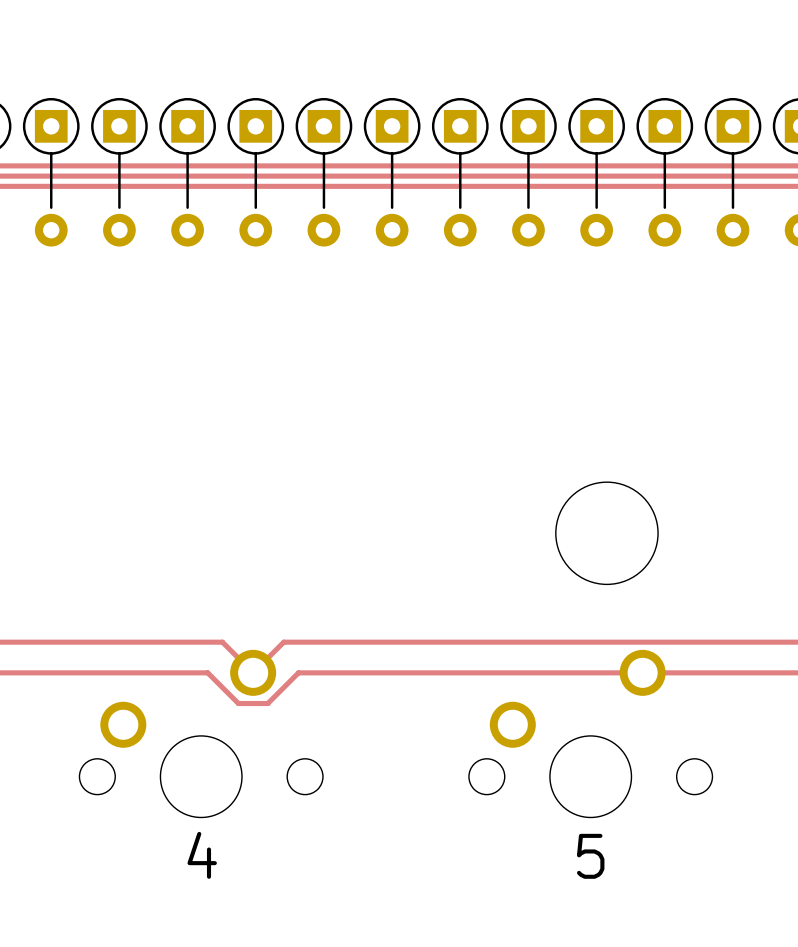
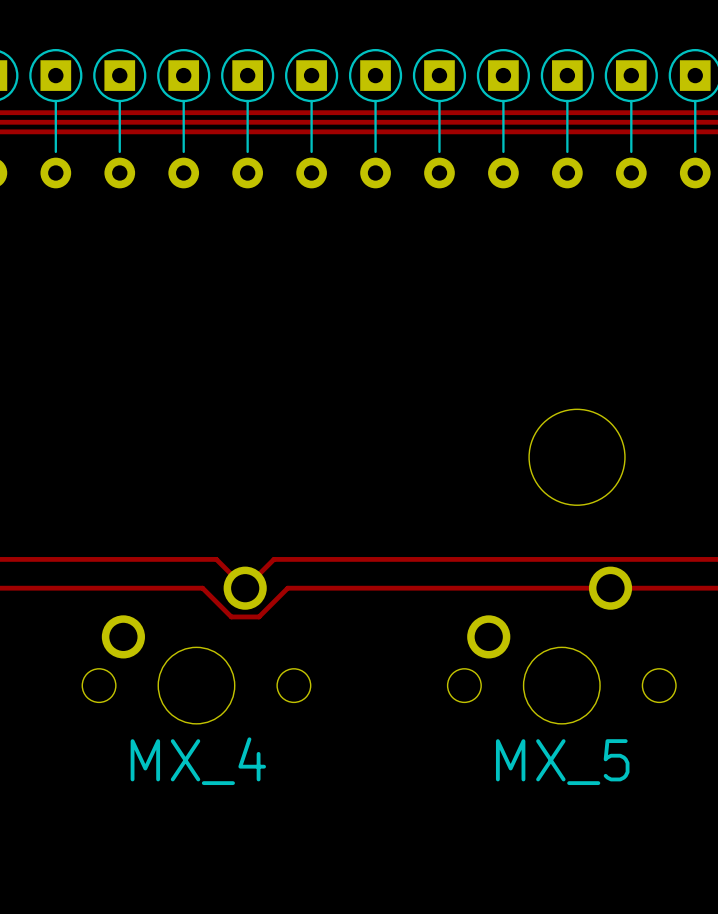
4 name: 4 (202, 855) -> MX_4 (198, 761)
5 name: 5 (590, 856) -> MX_5 (562, 762)

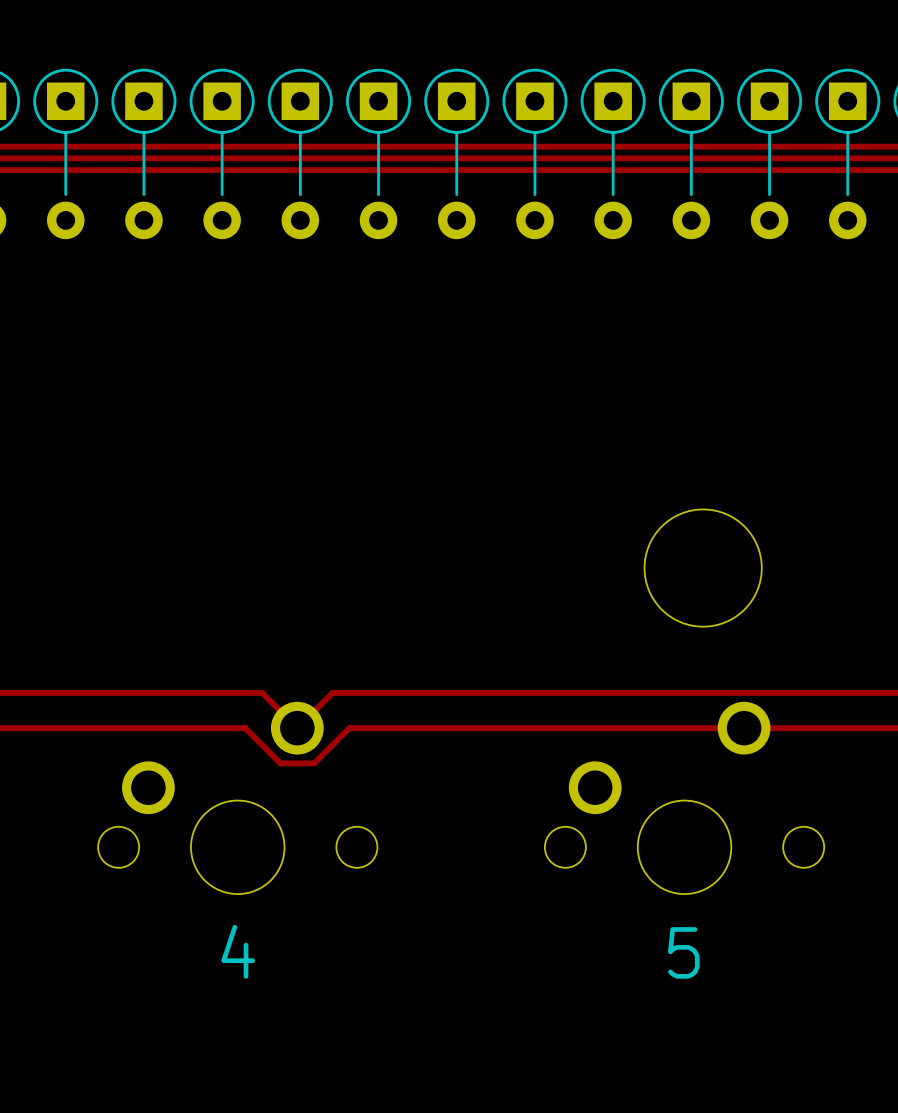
MX_4 name: MX_4 (198, 761) -> none
MX_5 name: MX_5 (562, 762) -> none
text: none -> 4 (238, 951)
text: none -> 5 (683, 952)

